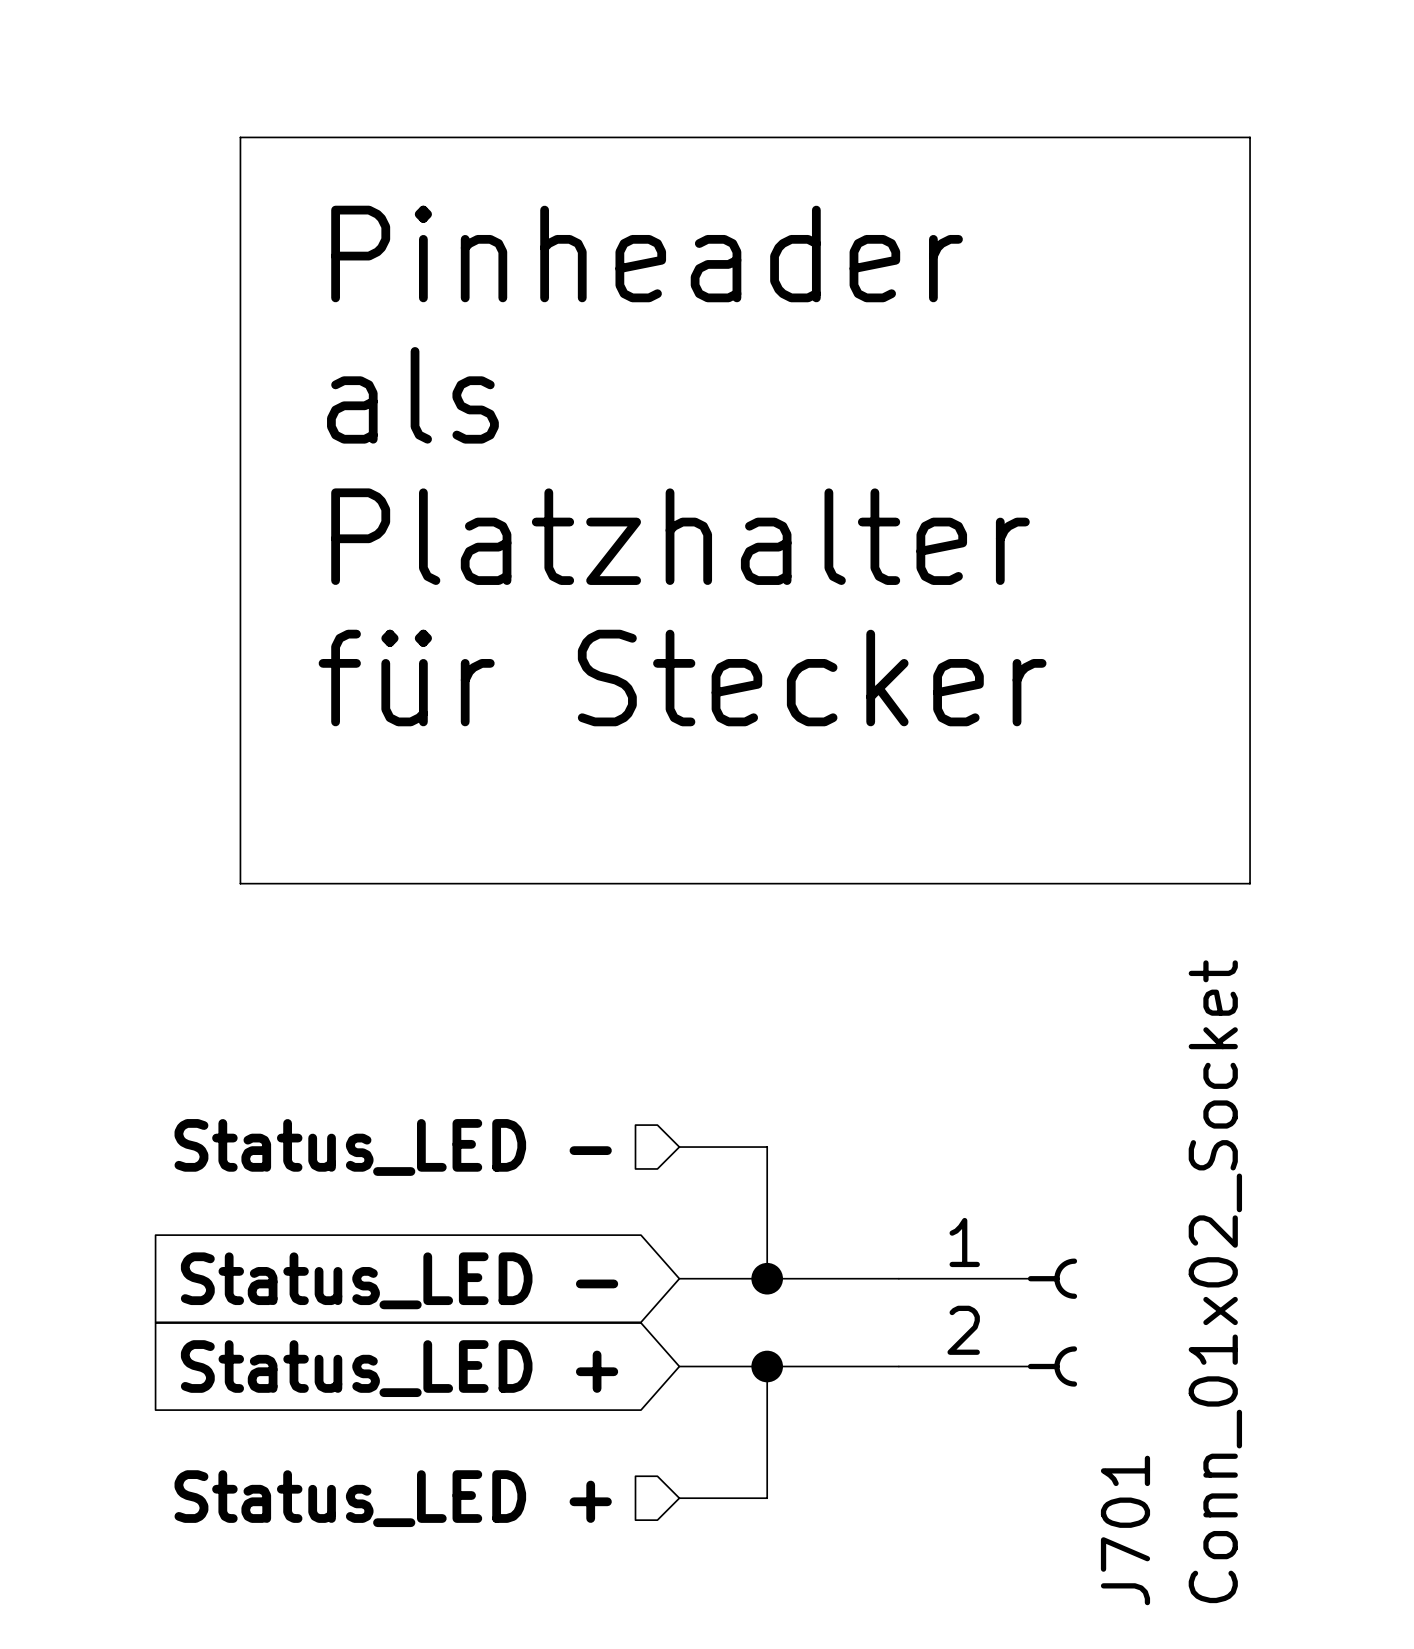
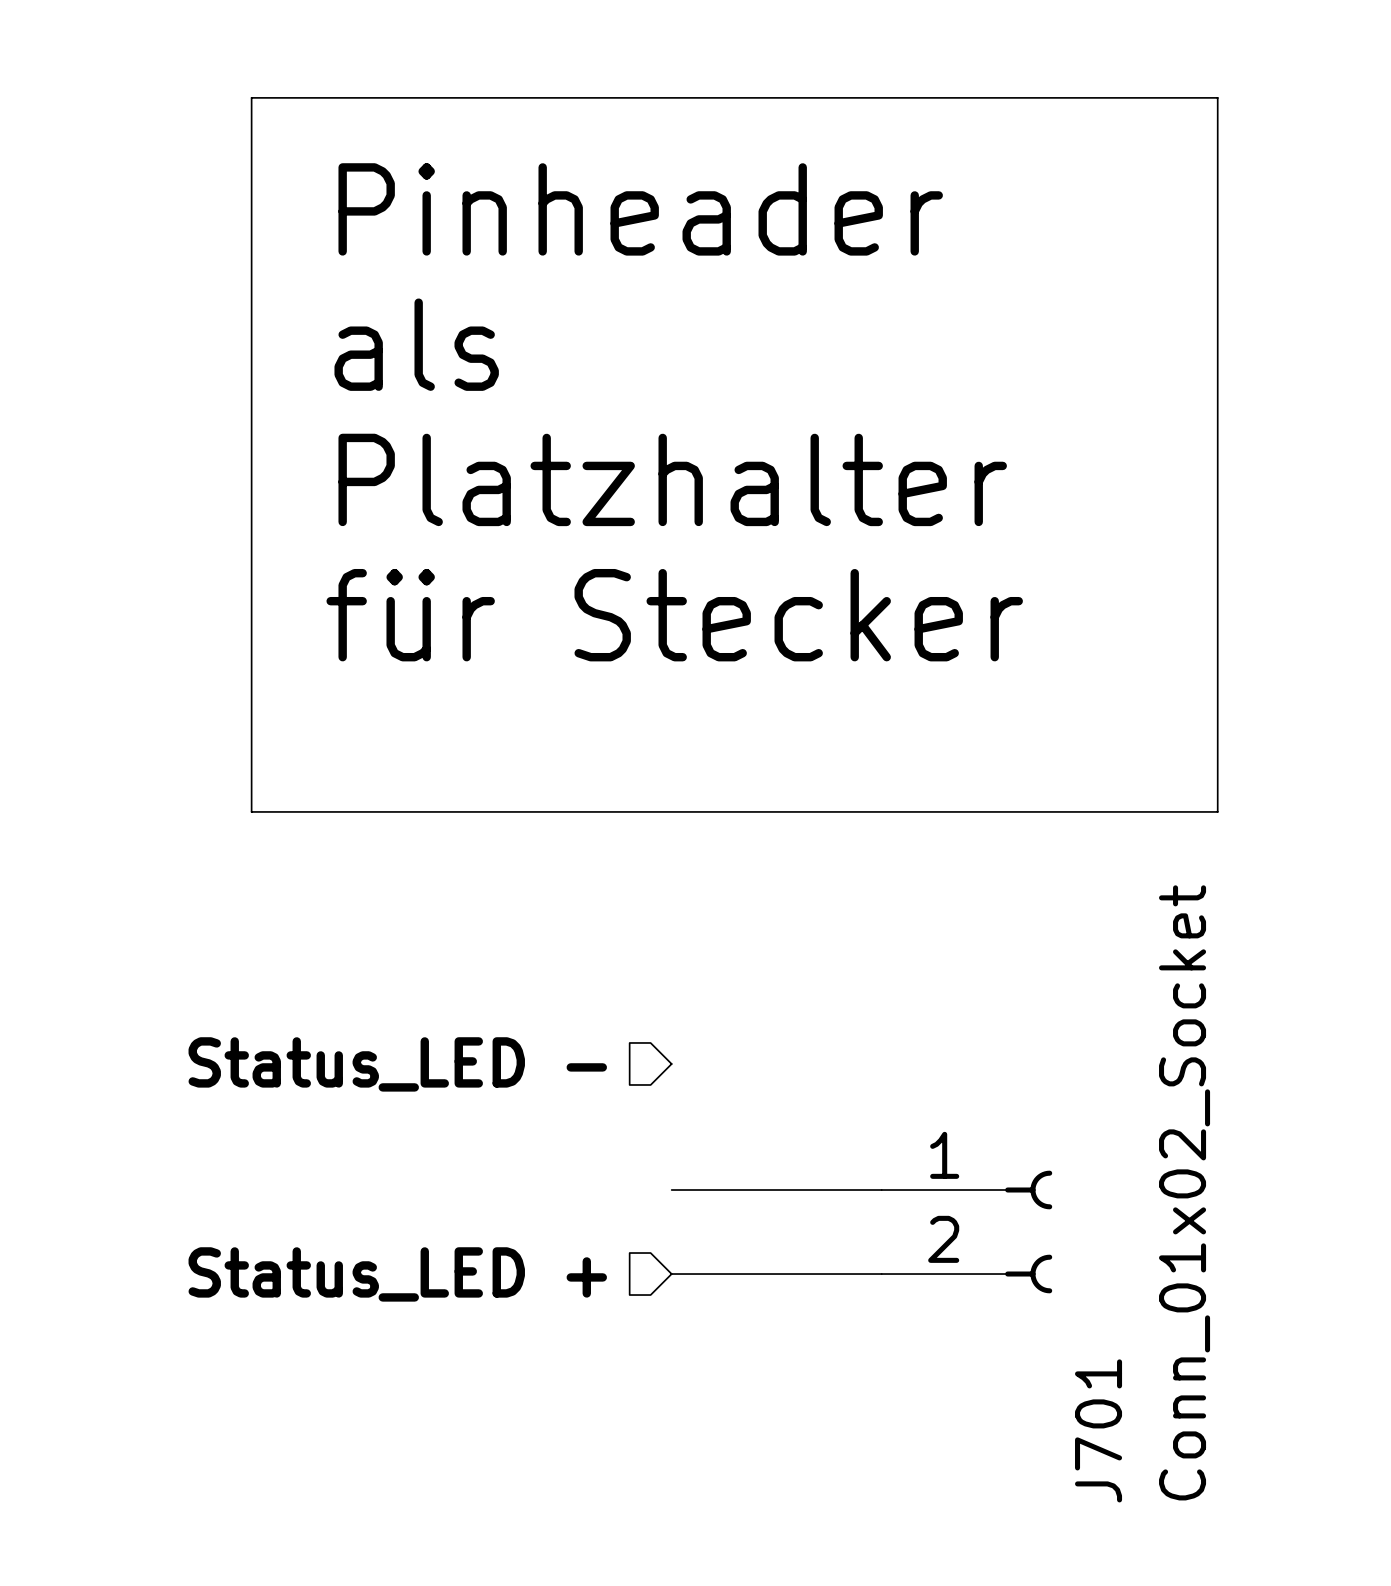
wire: (679, 1147) (767, 1147) (767, 1278) -> none
junction: (767, 1278) -> none
global label: Status_LED - (399, 1280) -> none
wire: (767, 1366) (767, 1498) (679, 1498) -> none
junction: (767, 1366) -> none
global label: Status_LED + (399, 1368) -> none
hierarchical label position: Status_LED + (393, 1498) -> Status_LED + (397, 1274)

